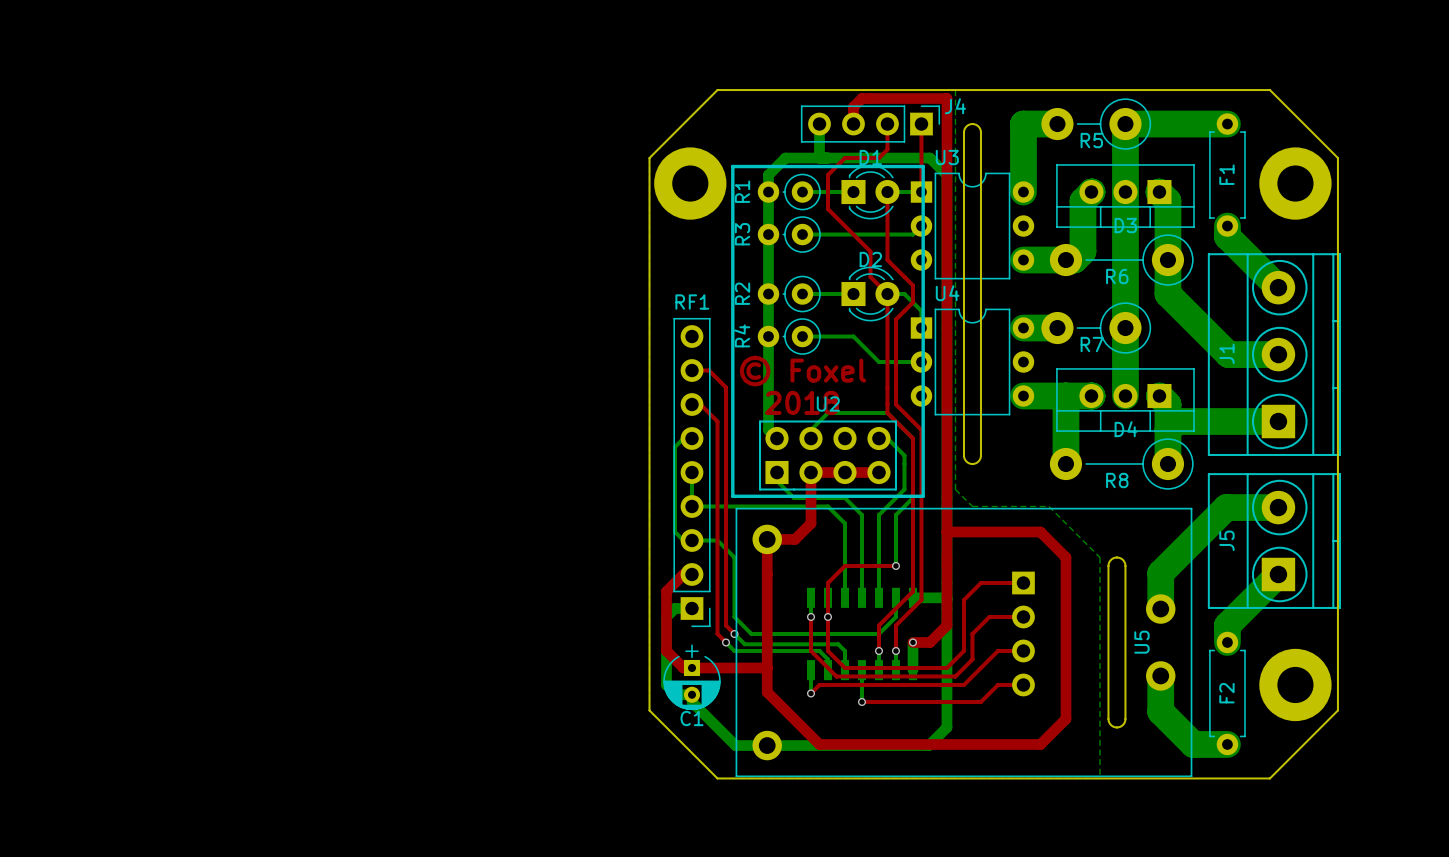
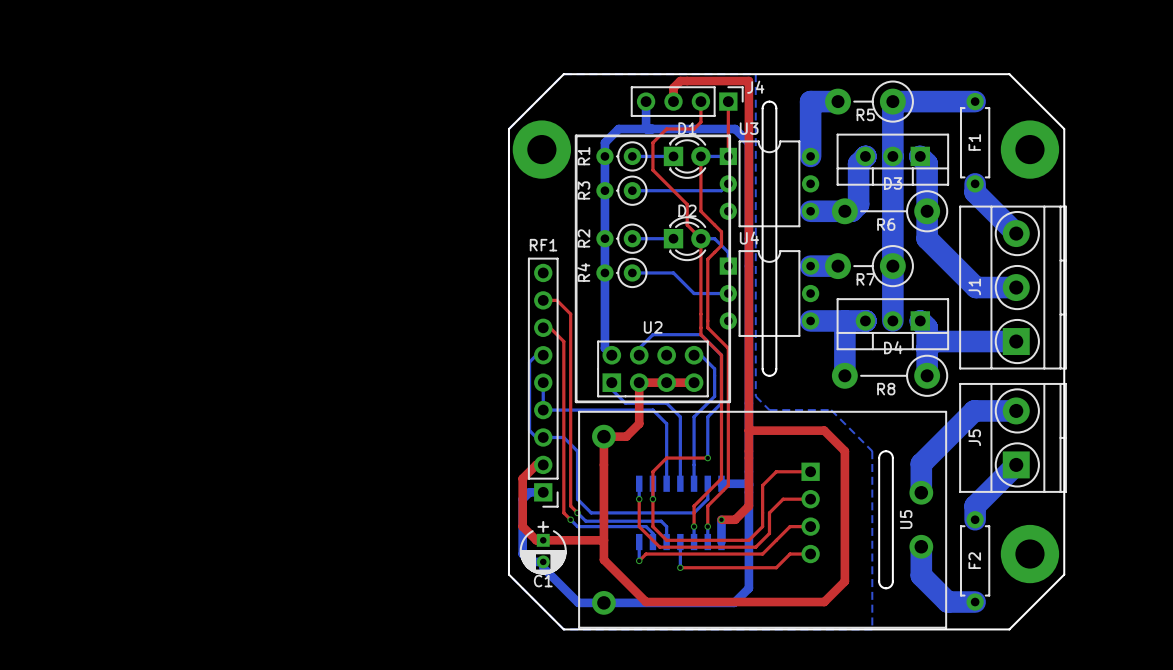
text: © Foxel (802, 371) -> none
text: 2018 (802, 402) -> none

